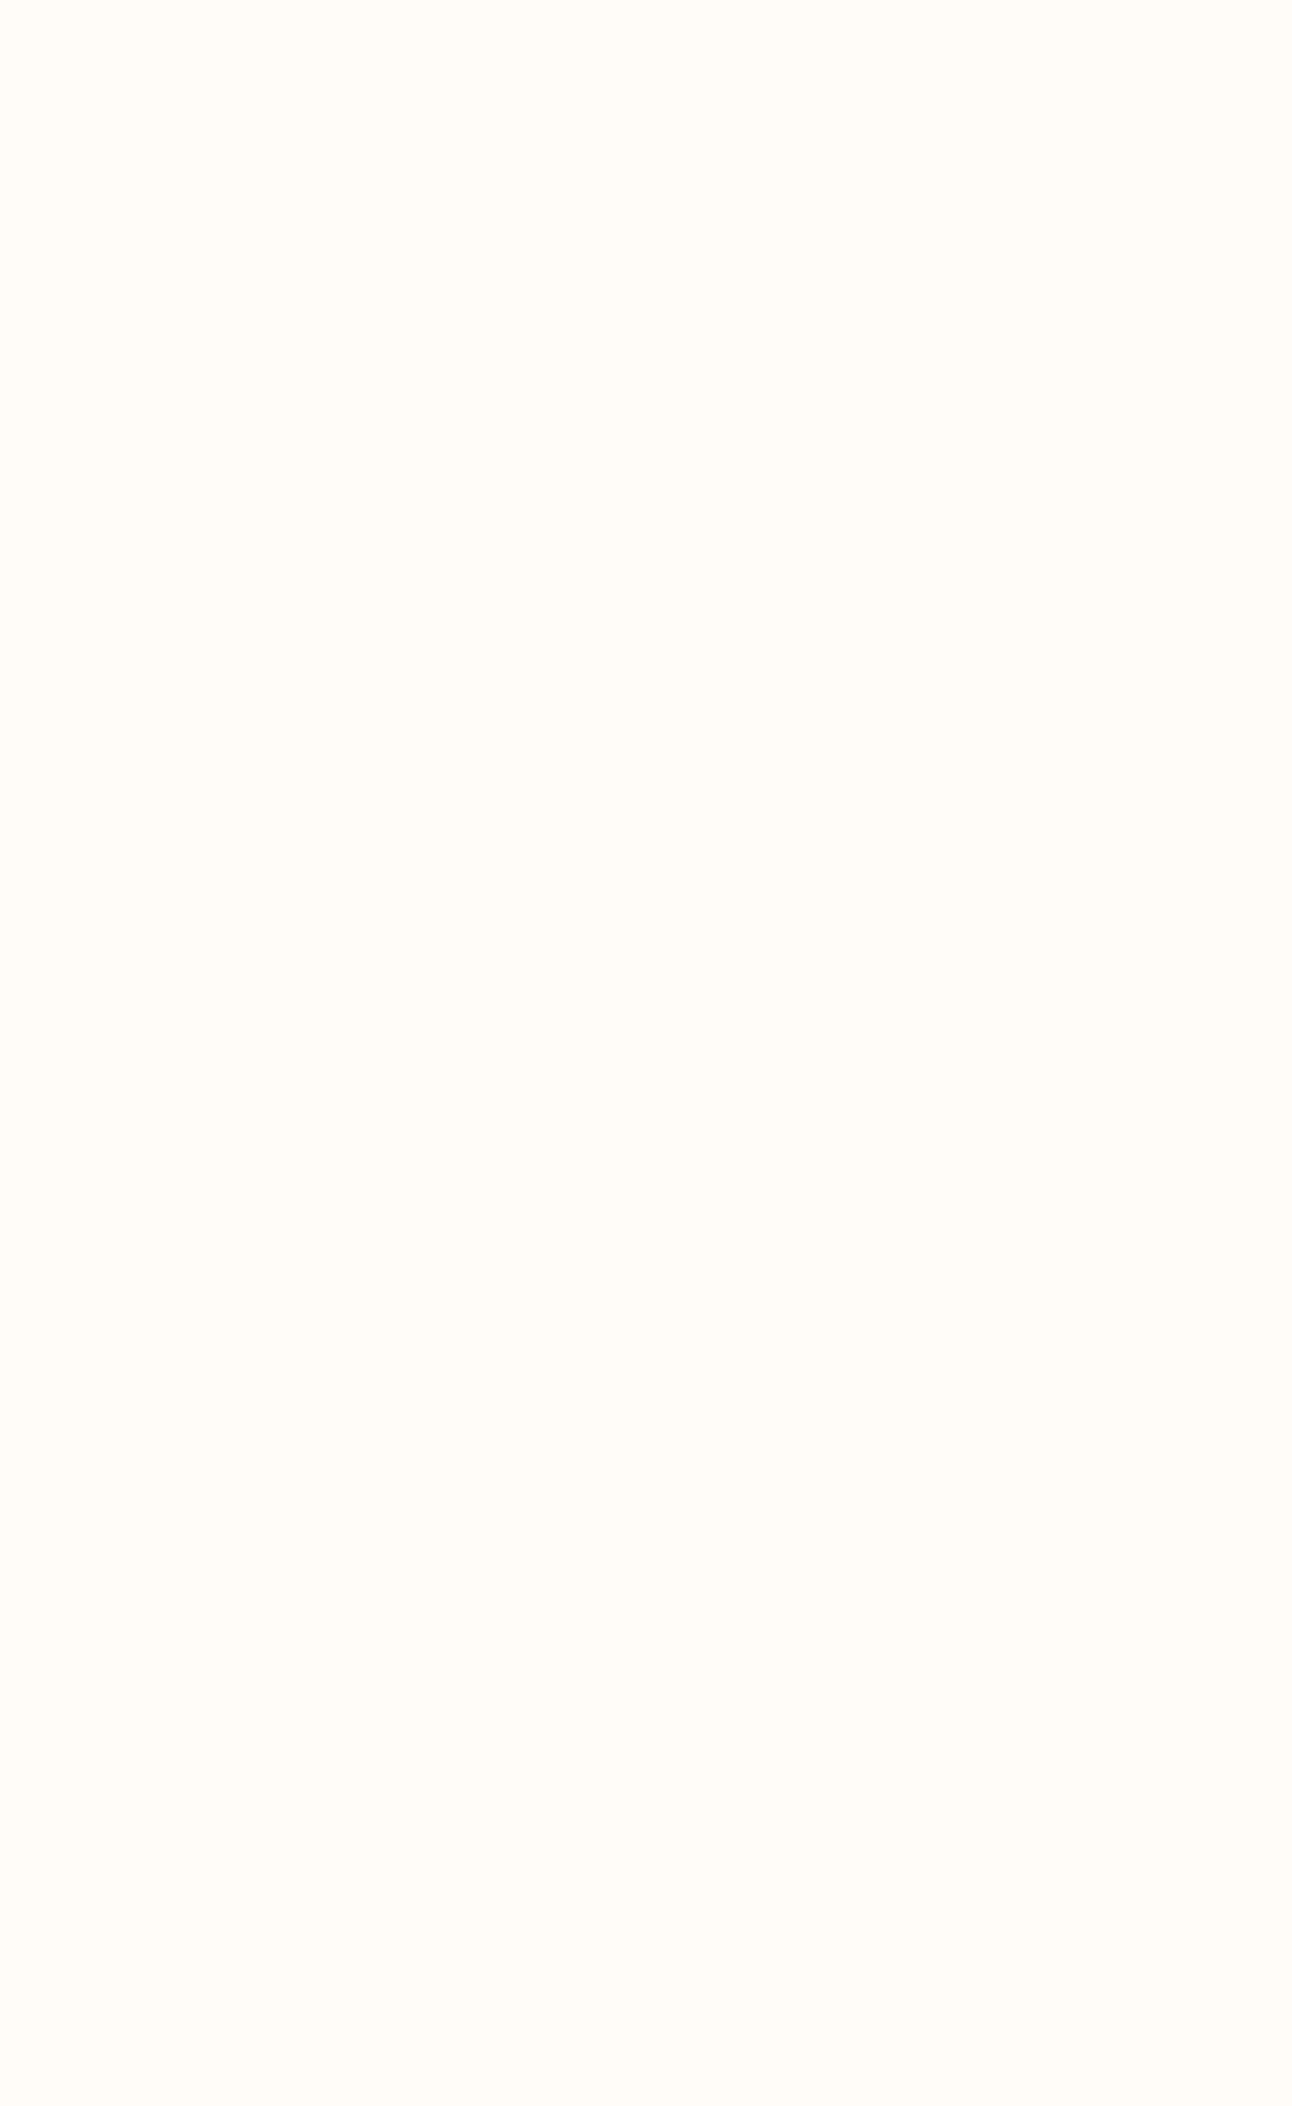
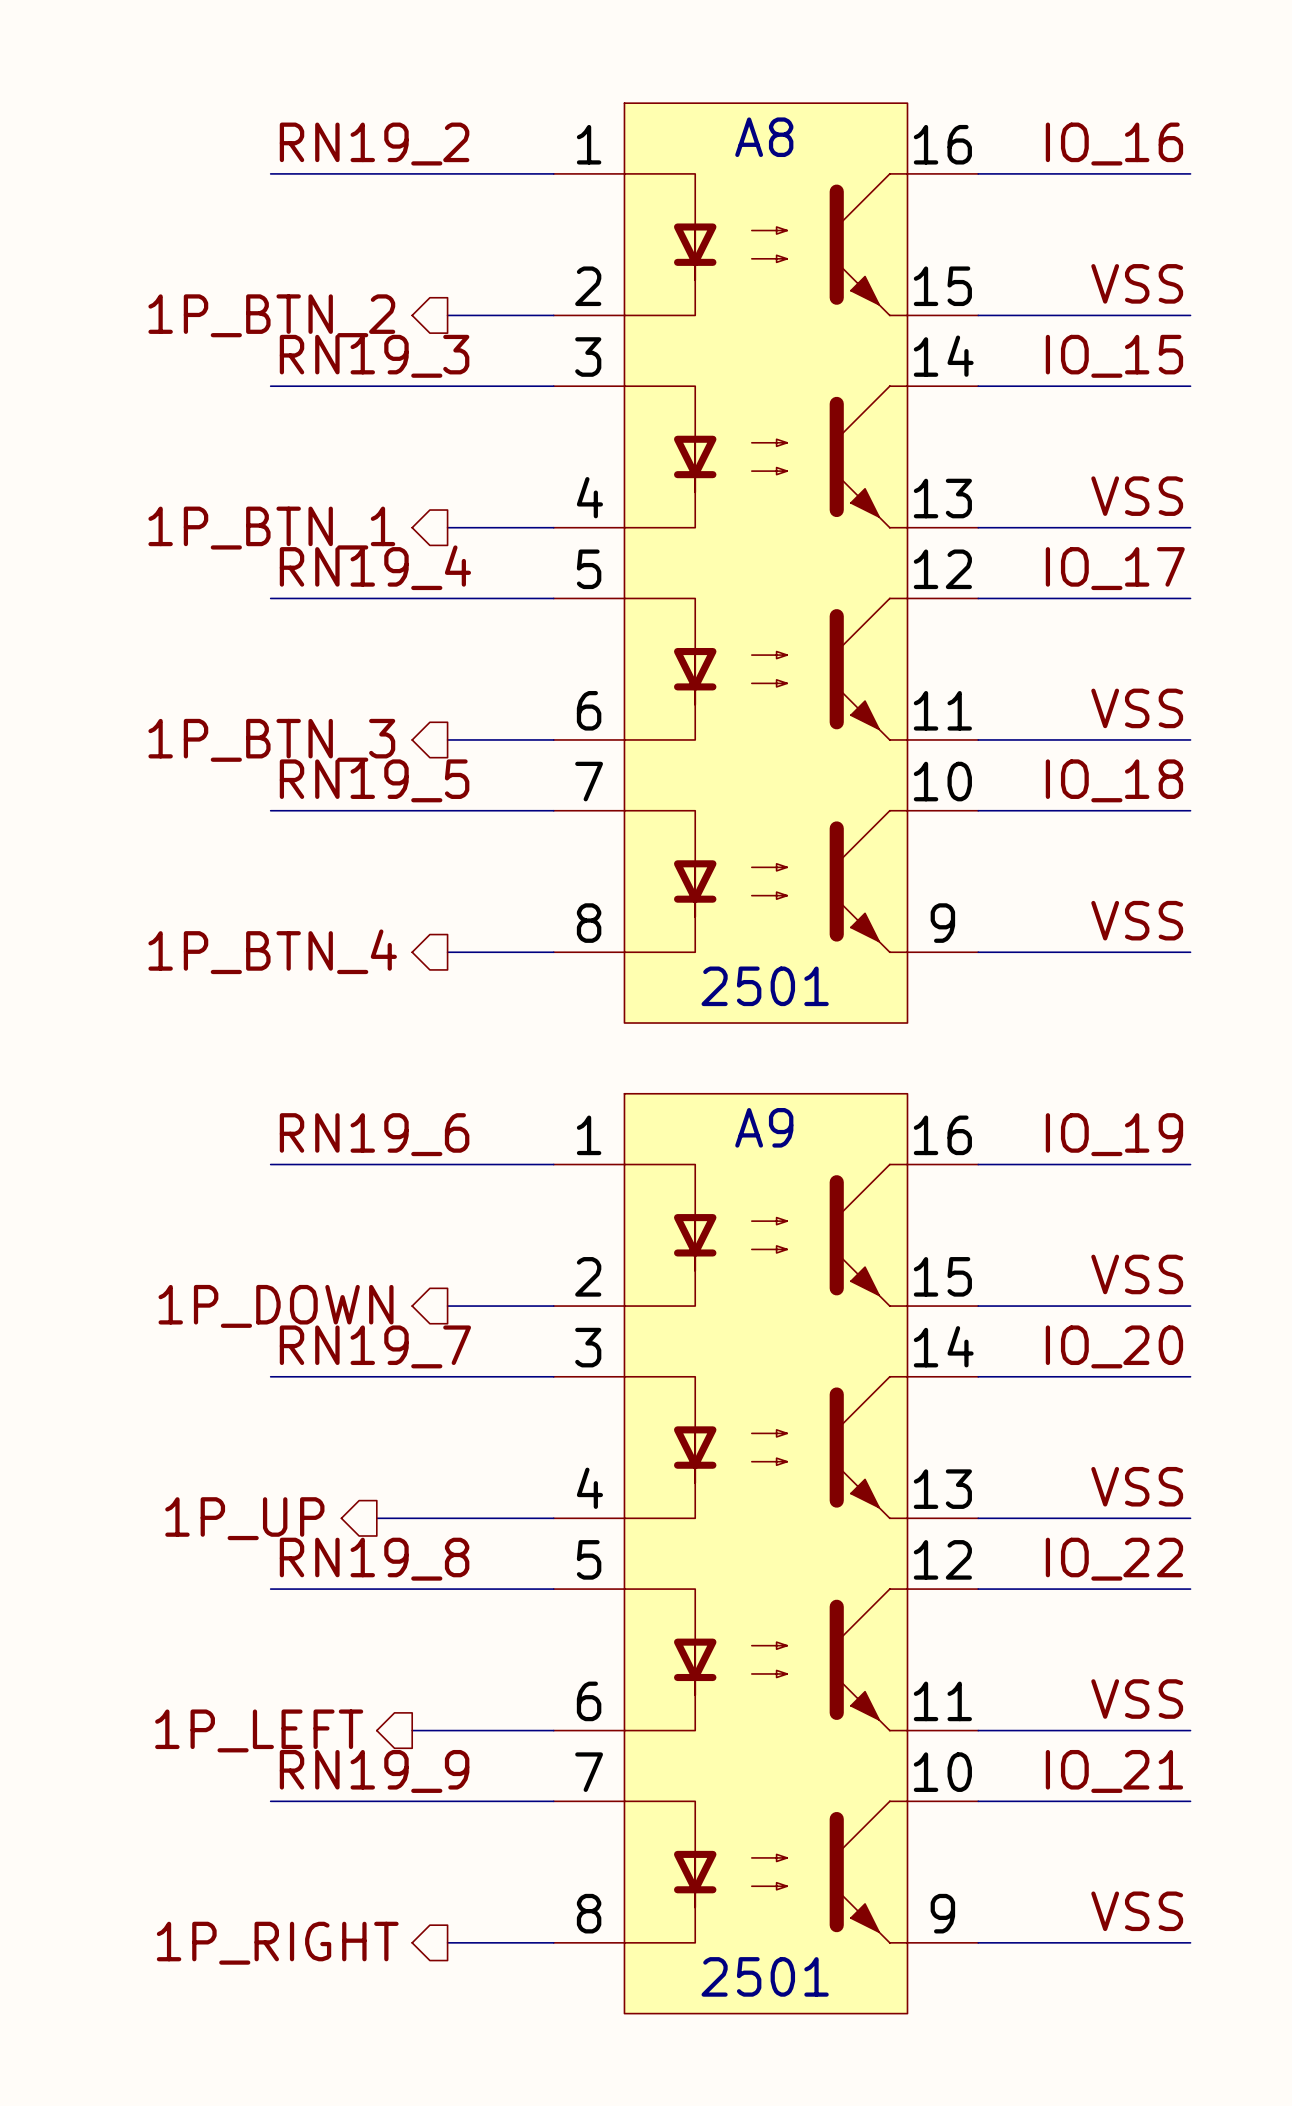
label: none -> RN19_2 (374, 144)
label: none -> IO_16 (1114, 144)
wire: none -> (270, 173) (553, 173)
wire: none -> (978, 173) (1190, 173)
label: none -> VSS (1137, 283)
hierarchical label: none -> 1P_BTN_2 (271, 315)
wire: none -> (447, 315) (553, 315)
wire: none -> (978, 315) (1190, 315)
label: none -> RN19_3 (374, 356)
label: none -> IO_15 (1114, 356)
wire: none -> (270, 386) (553, 386)
wire: none -> (978, 386) (1190, 386)
label: none -> VSS (1137, 496)
wire: none -> (447, 527) (553, 527)
wire: none -> (978, 527) (1190, 527)
hierarchical label: none -> 1P_BTN_1 (271, 528)
A8: none -> 2501 (765, 563)
label: none -> RN19_4 (375, 567)
label: none -> IO_17 (1115, 568)
wire: none -> (270, 598) (553, 598)
wire: none -> (978, 598) (1190, 598)
label: none -> VSS (1137, 708)
wire: none -> (447, 739) (553, 739)
wire: none -> (978, 739) (1190, 739)
hierarchical label: none -> 1P_BTN_3 (271, 740)
label: none -> RN19_5 (374, 780)
label: none -> IO_18 (1114, 780)
wire: none -> (270, 810) (553, 810)
wire: none -> (978, 810) (1190, 810)
label: none -> VSS (1137, 920)
hierarchical label: none -> 1P_BTN_4 (272, 951)
wire: none -> (447, 952) (553, 952)
wire: none -> (978, 952) (1190, 952)
label: none -> RN19_6 (374, 1134)
label: none -> IO_19 (1114, 1134)
wire: none -> (270, 1164) (553, 1164)
wire: none -> (978, 1164) (1190, 1164)
label: none -> VSS (1137, 1274)
hierarchical label: none -> 1P_DOWN (276, 1306)
wire: none -> (447, 1306) (553, 1306)
wire: none -> (978, 1306) (1190, 1306)
label: none -> RN19_7 (375, 1346)
label: none -> IO_20 (1114, 1346)
wire: none -> (270, 1376) (553, 1376)
wire: none -> (978, 1376) (1190, 1376)
label: none -> VSS (1137, 1486)
hierarchical label: none -> 1P_UP (244, 1518)
wire: none -> (376, 1518) (553, 1518)
wire: none -> (978, 1518) (1190, 1518)
A9: none -> 2501 (765, 1553)
label: none -> RN19_8 (374, 1559)
label: none -> IO_22 (1114, 1559)
wire: none -> (270, 1589) (553, 1589)
wire: none -> (978, 1589) (1190, 1589)
label: none -> VSS (1137, 1699)
hierarchical label: none -> 1P_LEFT (259, 1730)
wire: none -> (412, 1730) (553, 1730)
wire: none -> (978, 1730) (1190, 1730)
label: none -> RN19_9 (374, 1771)
label: none -> IO_21 (1114, 1771)
wire: none -> (270, 1801) (553, 1801)
wire: none -> (978, 1801) (1190, 1801)
label: none -> VSS (1137, 1911)
wire: none -> (447, 1942) (553, 1942)
wire: none -> (978, 1942) (1190, 1942)
hierarchical label: none -> 1P_RIGHT (277, 1943)

